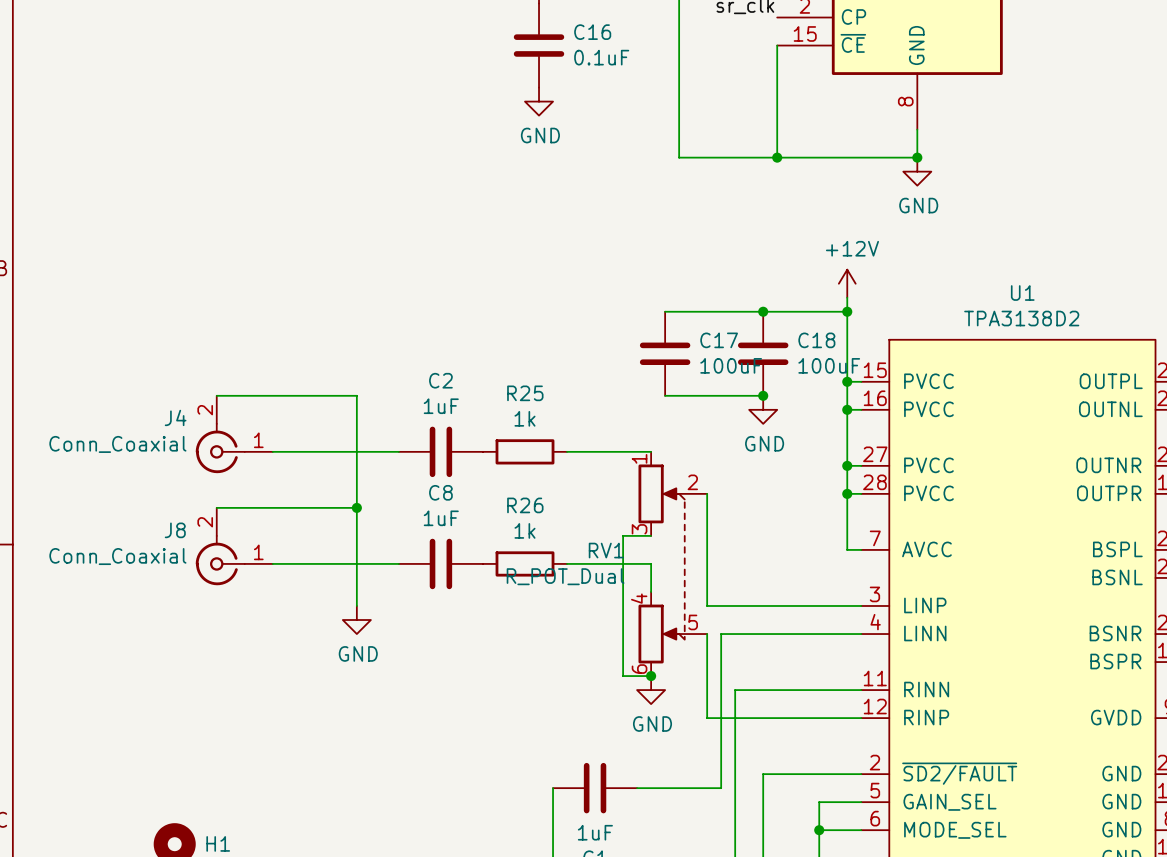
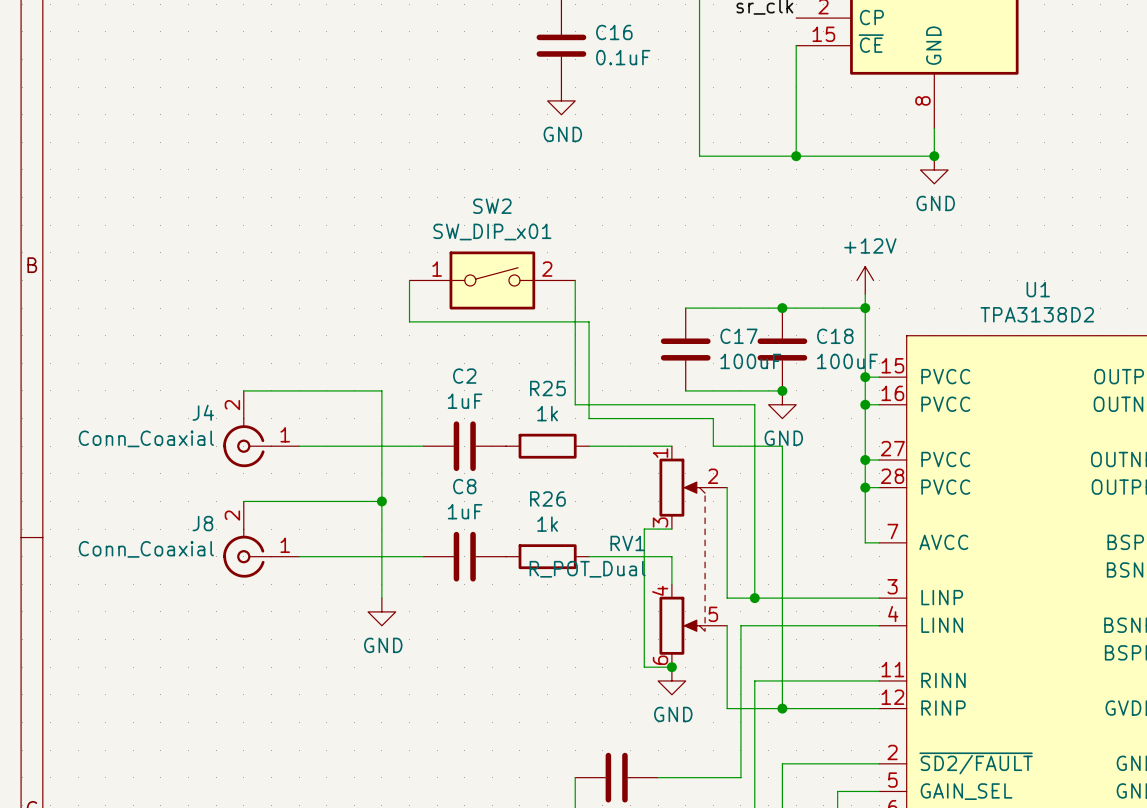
wire: none -> (409, 280) (409, 321) (589, 321) (589, 418) (713, 418) (713, 446) (782, 446) (782, 708)
SW2: none -> SW_DIP_x01 (492, 280)
wire: none -> (575, 280) (575, 404) (754, 404) (754, 598)
junction: none -> (754, 598)
junction: none -> (782, 708)

